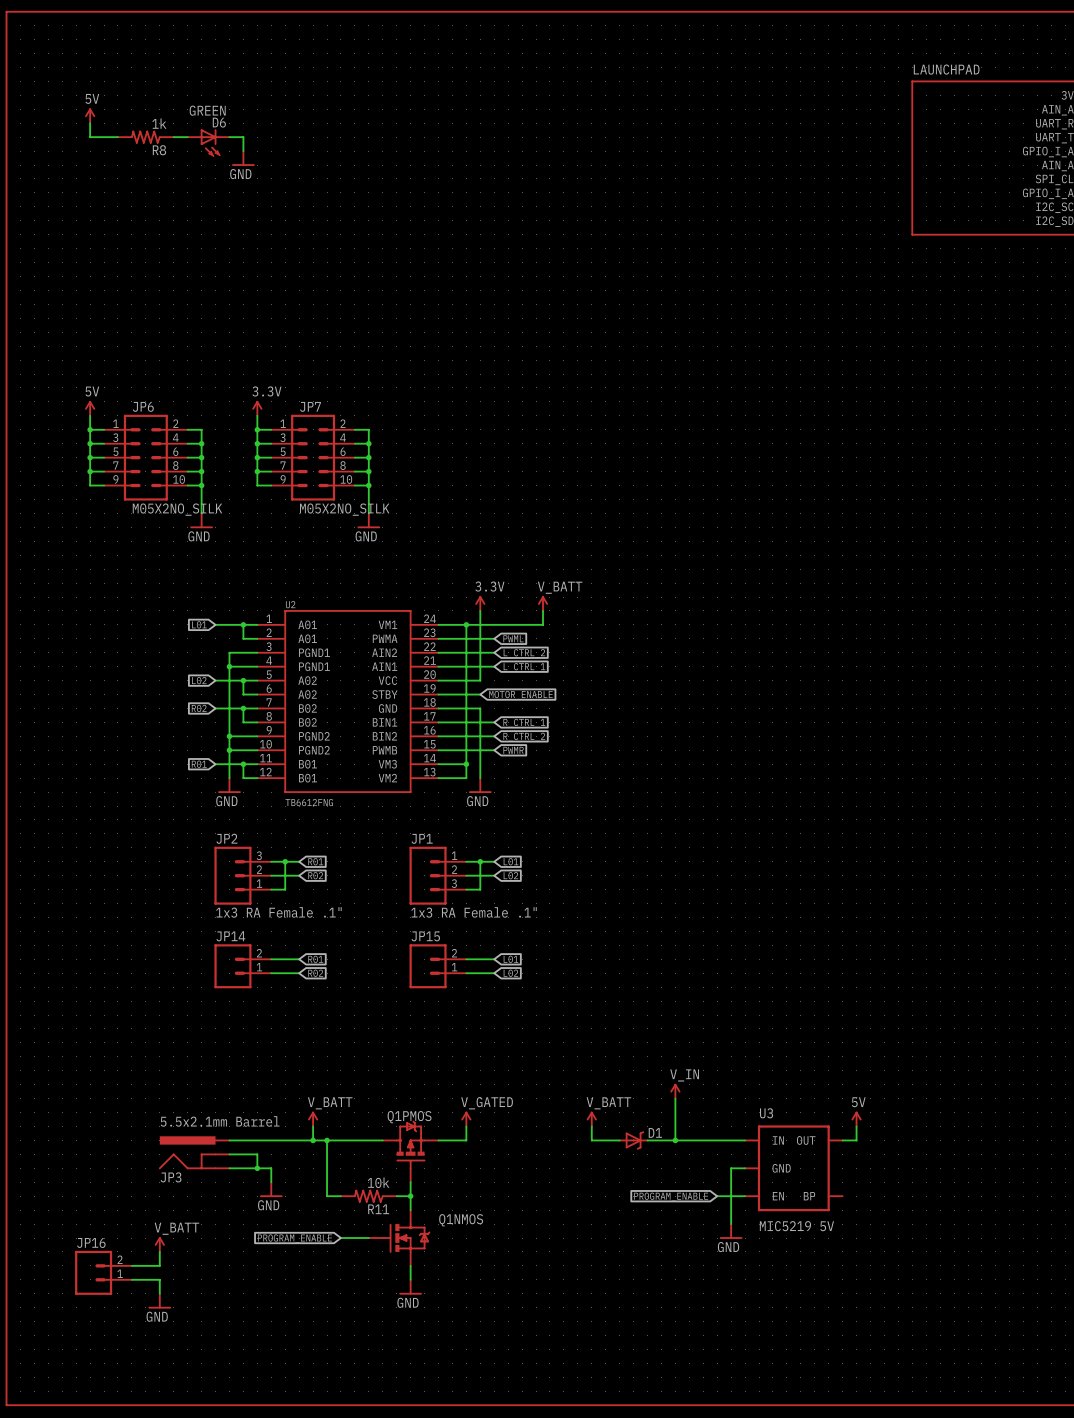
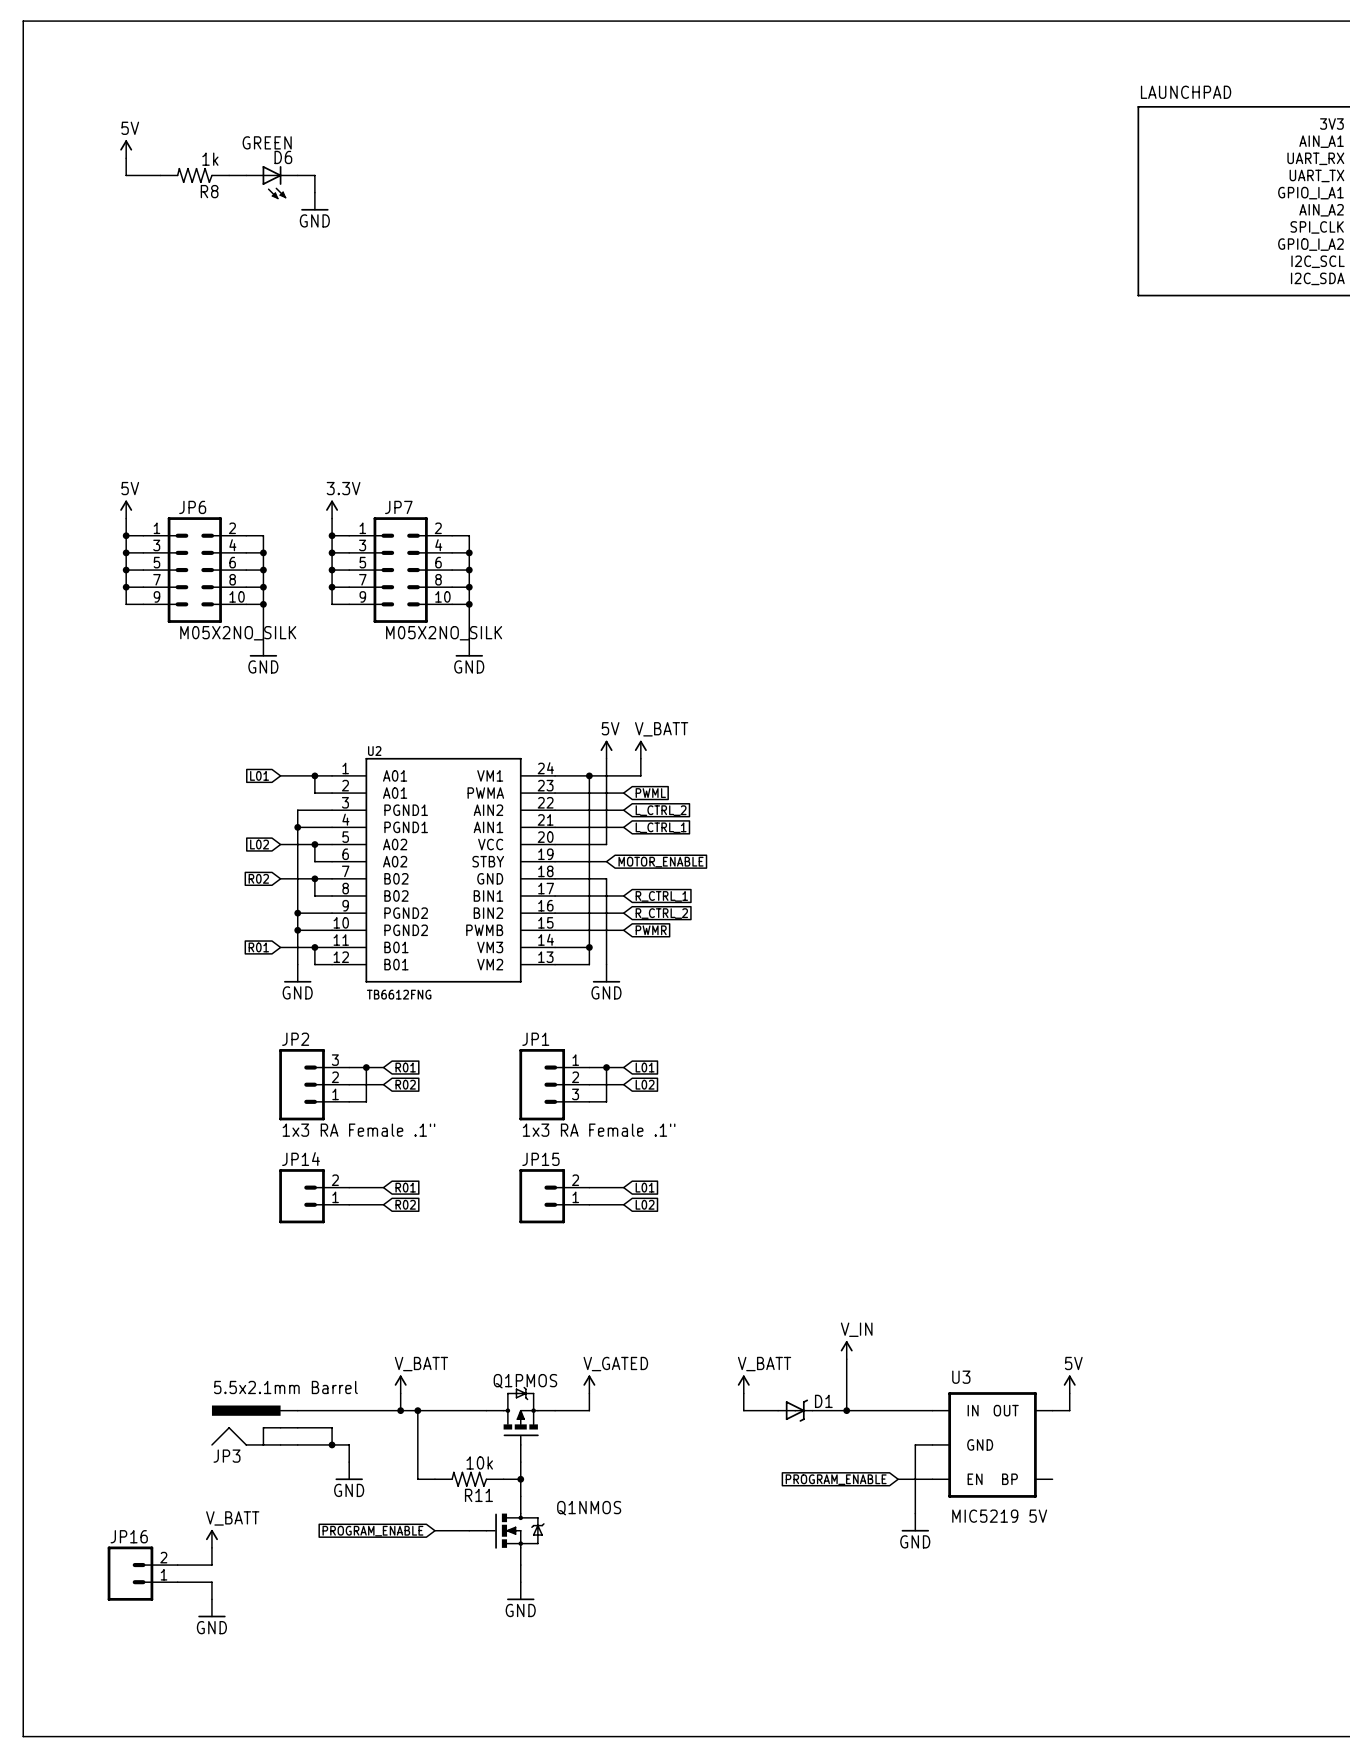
power symbol: 3.3V (480, 603) -> 5V (606, 749)
power symbol position: V_BATT (543, 603) -> V_BATT (640, 749)
wire: (543, 610) (543, 624) (508, 624) -> (640, 758) (640, 775)

